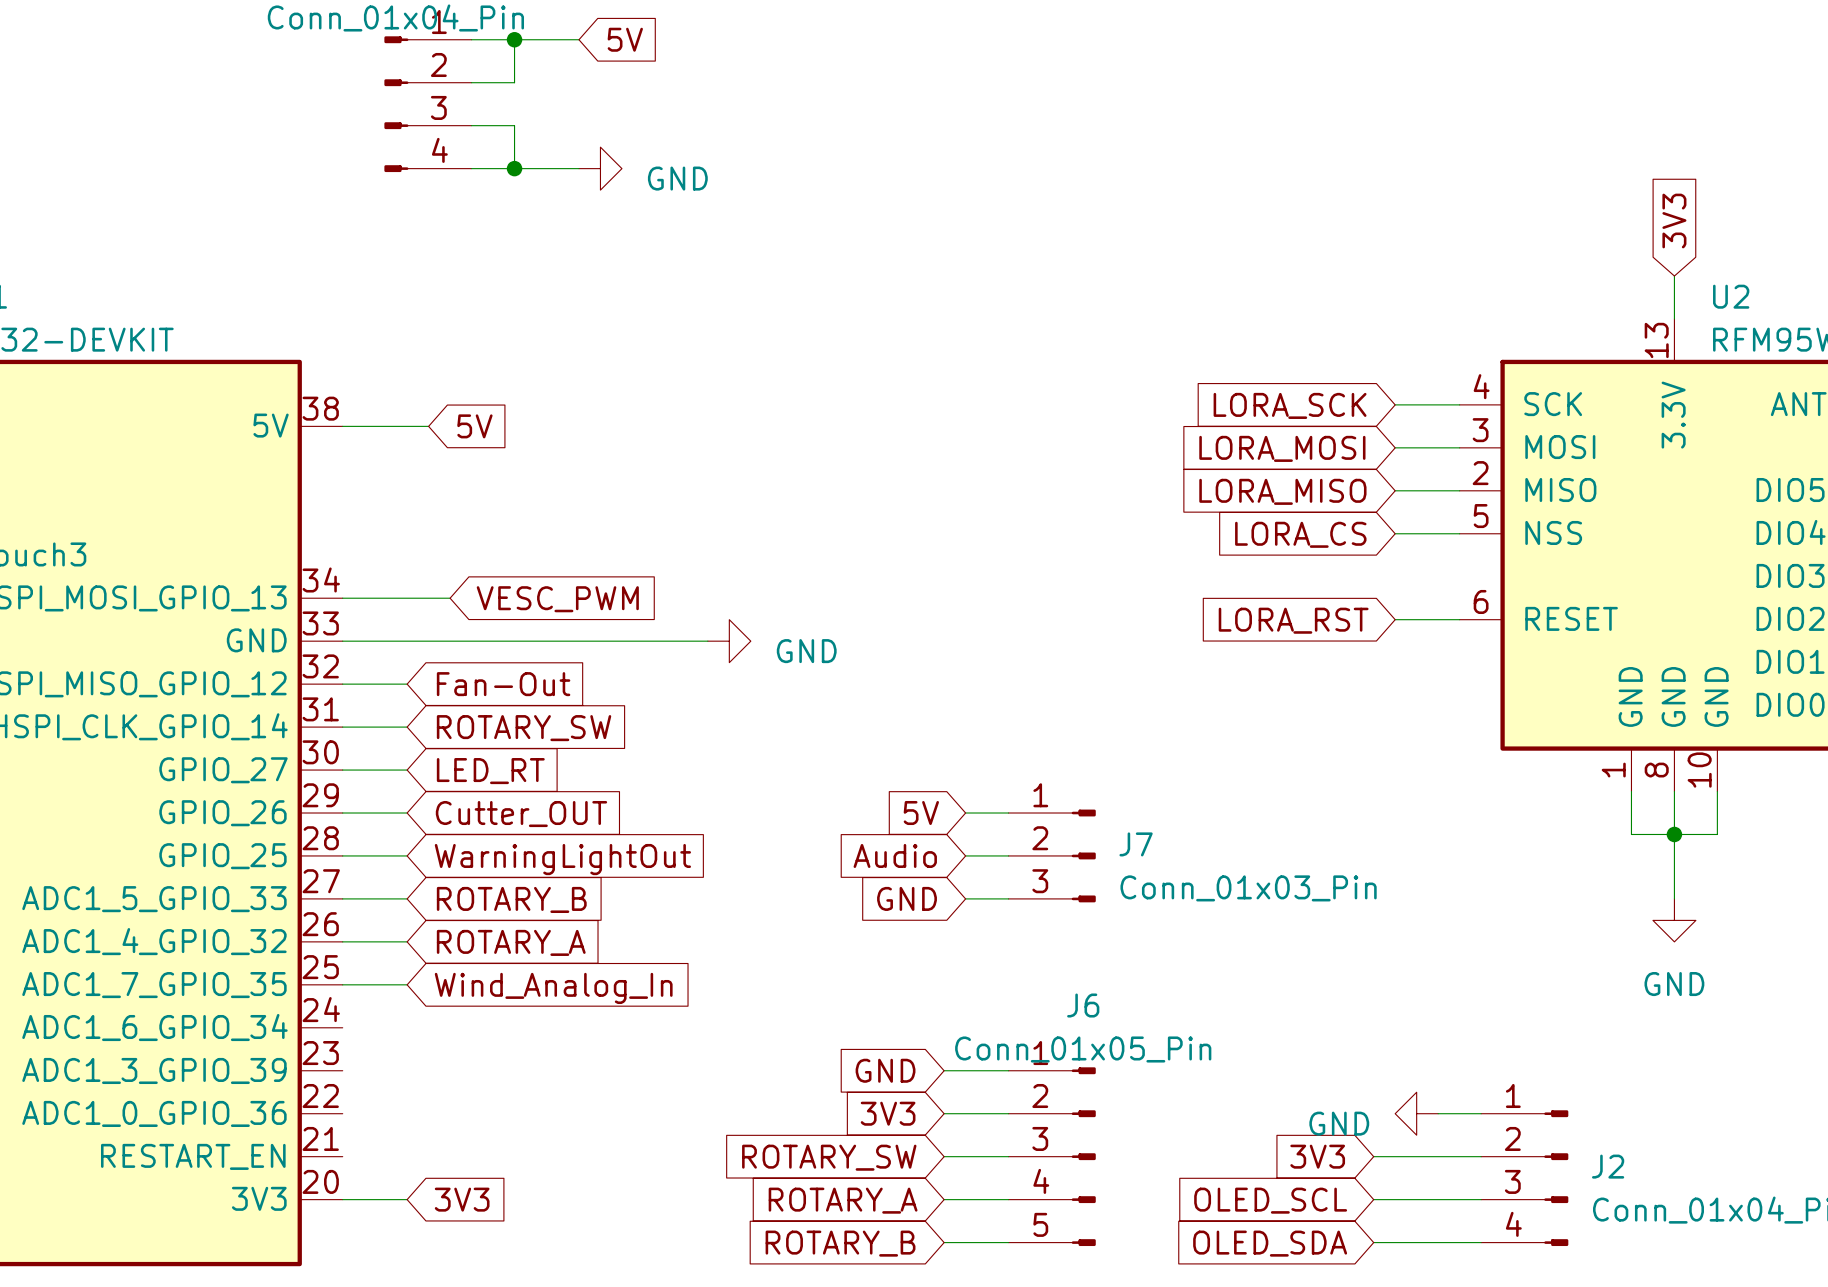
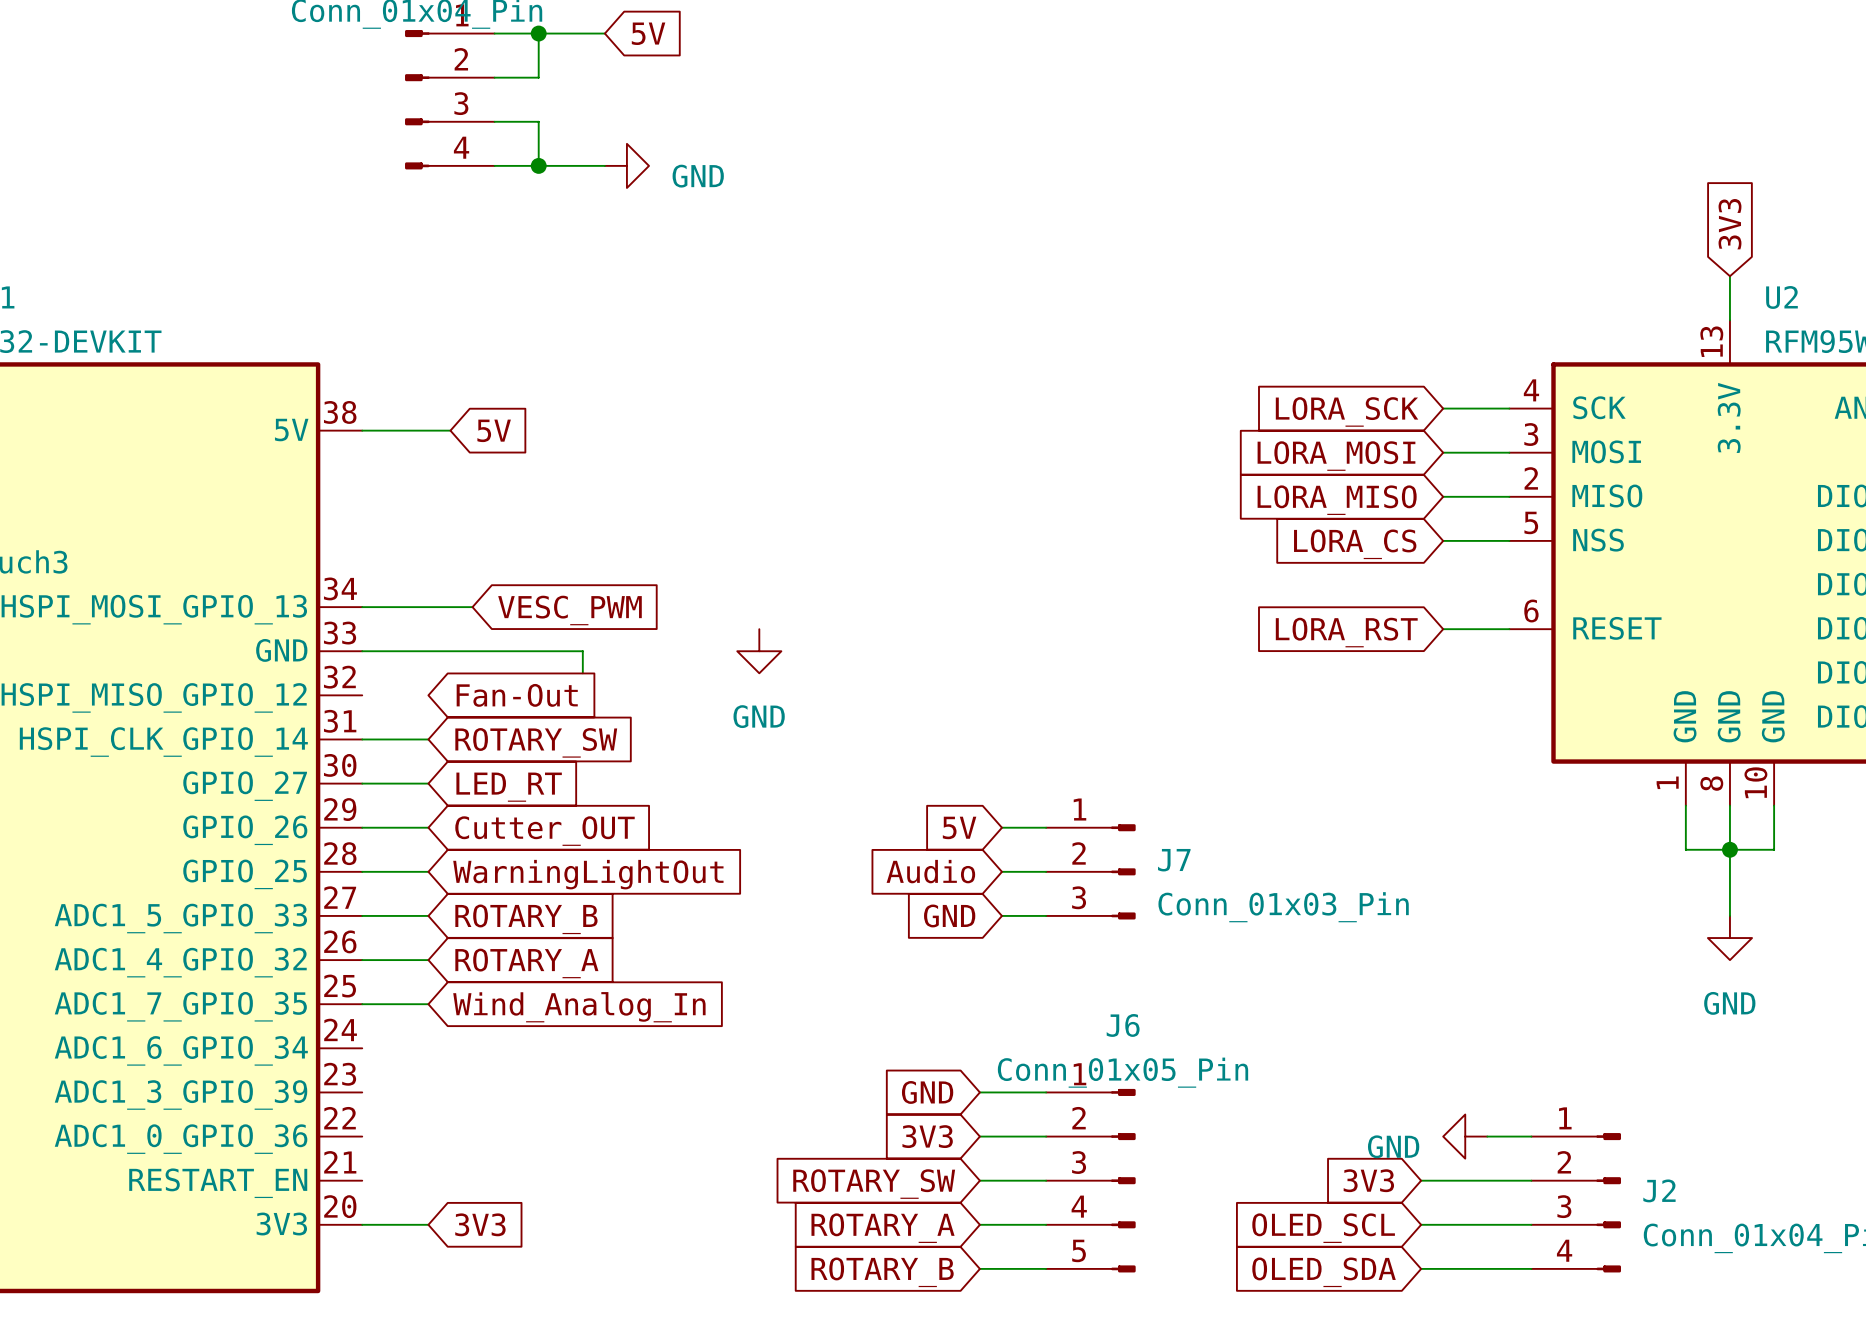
wire: (557, 641) (707, 641) -> (582, 651) (582, 673)
power symbol rotation: 0° (729, 641) -> 90° clockwise (759, 651)
wire: (342, 684) (407, 684) -> none

